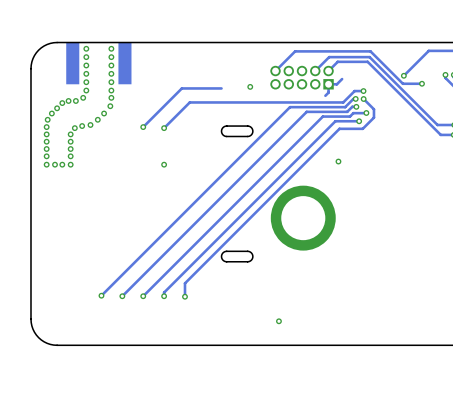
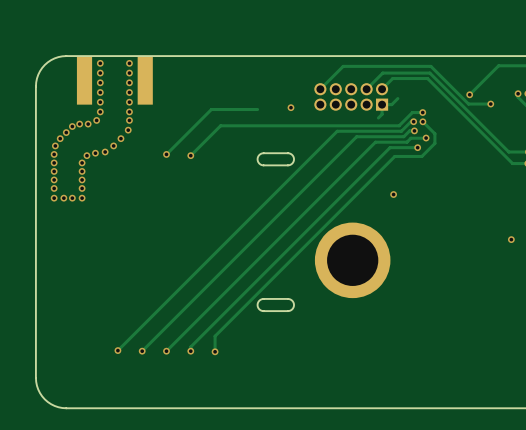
via: (164, 164) -> none
via: none -> (511, 239)
via: (278, 321) -> none

